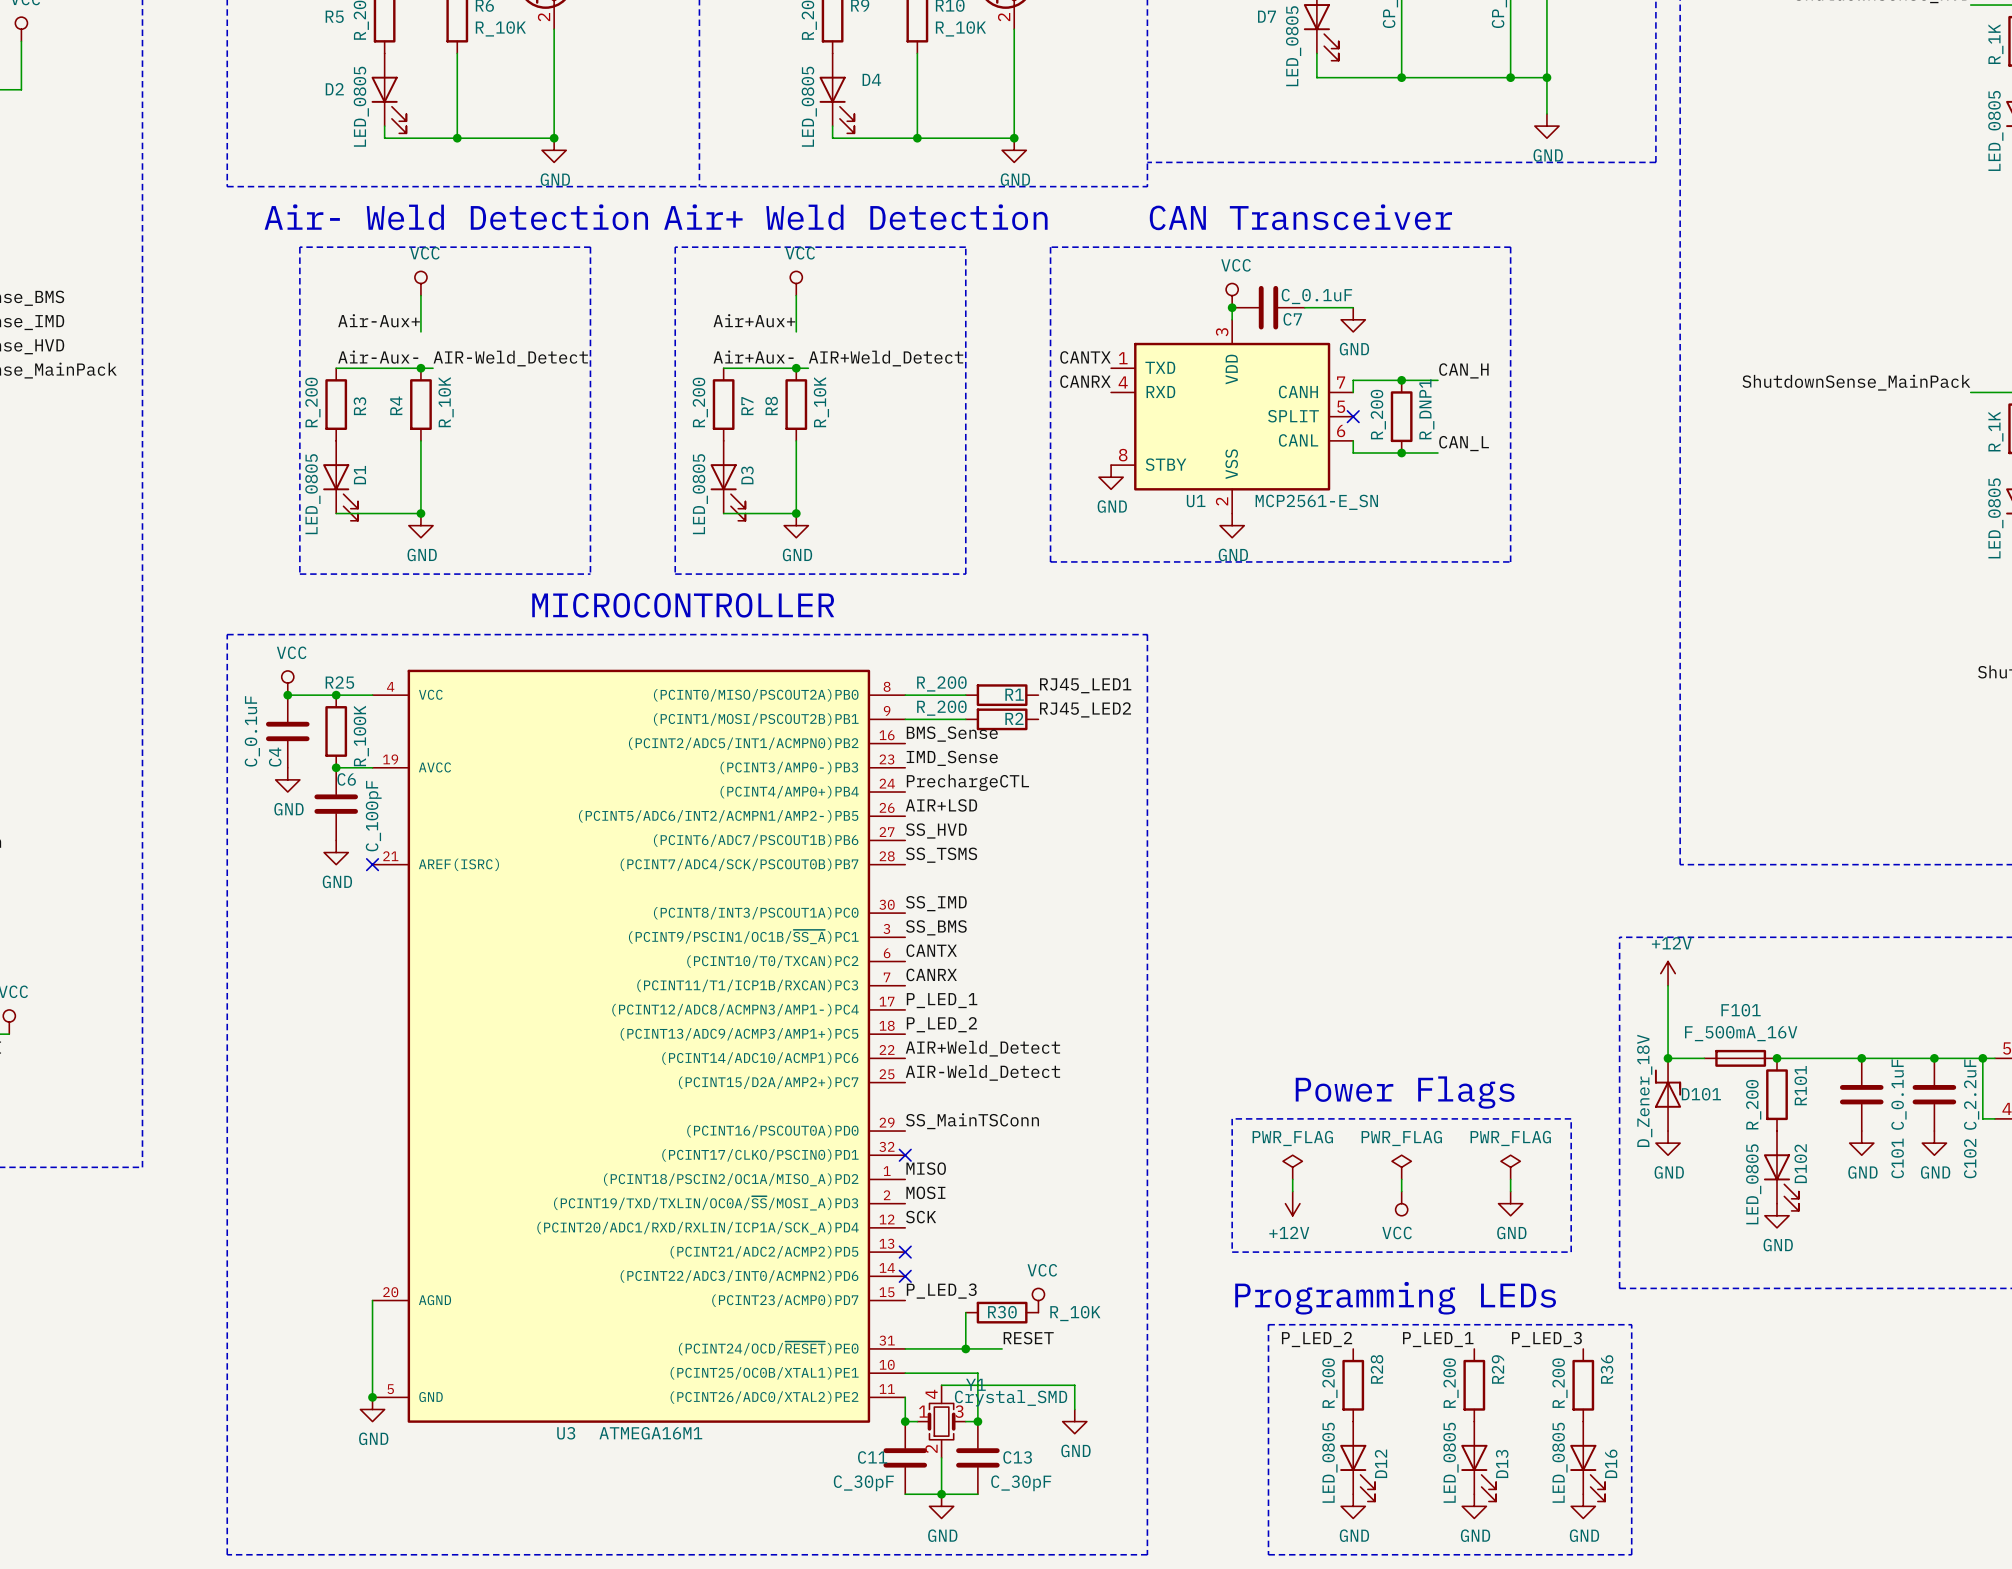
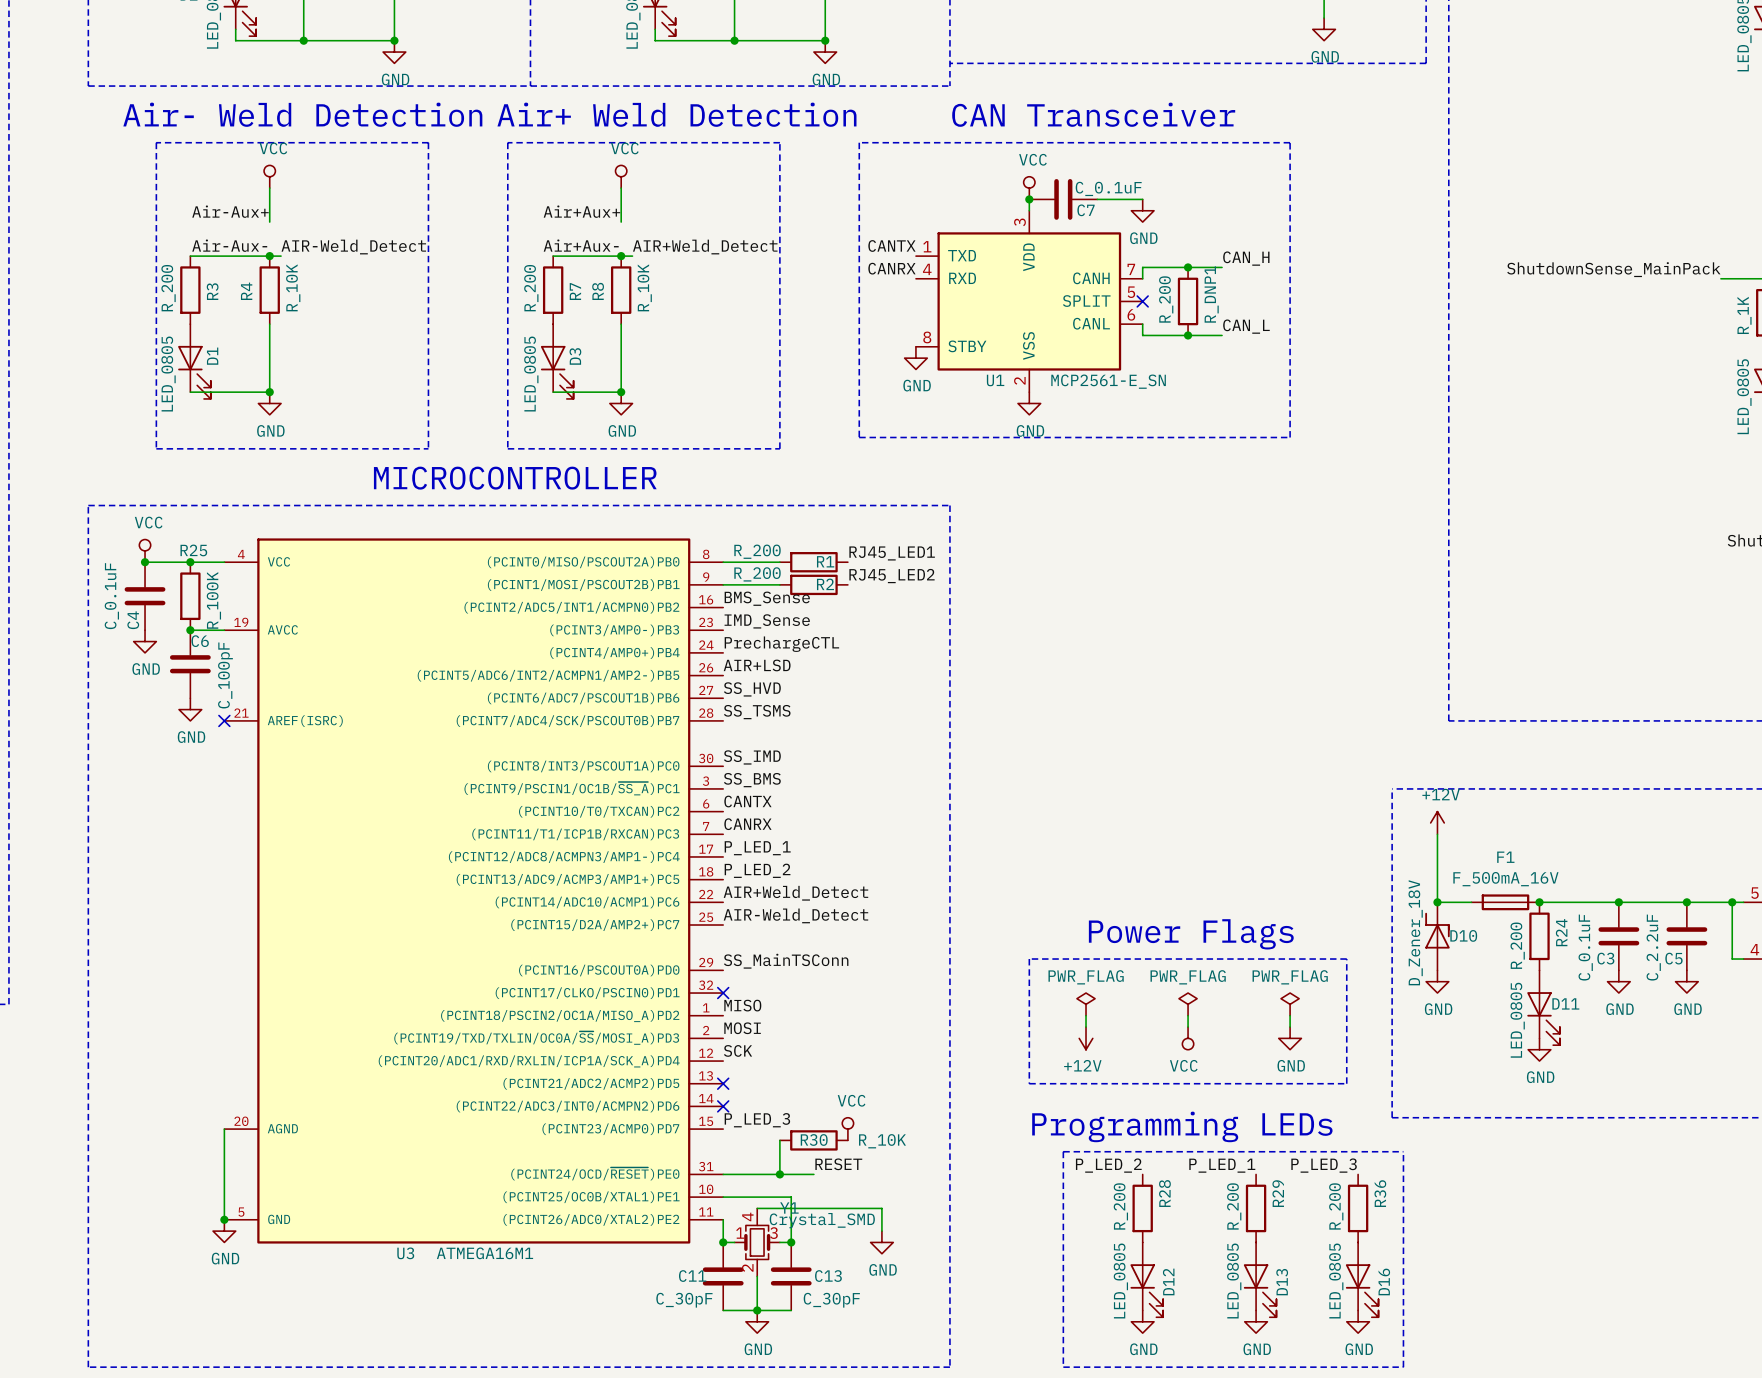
F101 name: F101 (1741, 1010) -> F1 (1505, 857)
R101 name: R101 (1800, 1085) -> R24 (1561, 932)
D101 name: D101 (1701, 1094) -> D10 (1463, 935)
C101 value position: C_0.1uF (1898, 1094) -> C_0.1uF (1585, 947)
C102 value position: C_2.2uF (1971, 1094) -> C_2.2uF (1653, 947)
C101 name: C101 (1897, 1158) -> C3 (1605, 958)
C102 name: C102 (1970, 1158) -> C5 (1673, 958)
D102 name: D102 (1800, 1163) -> D11 (1565, 1003)

